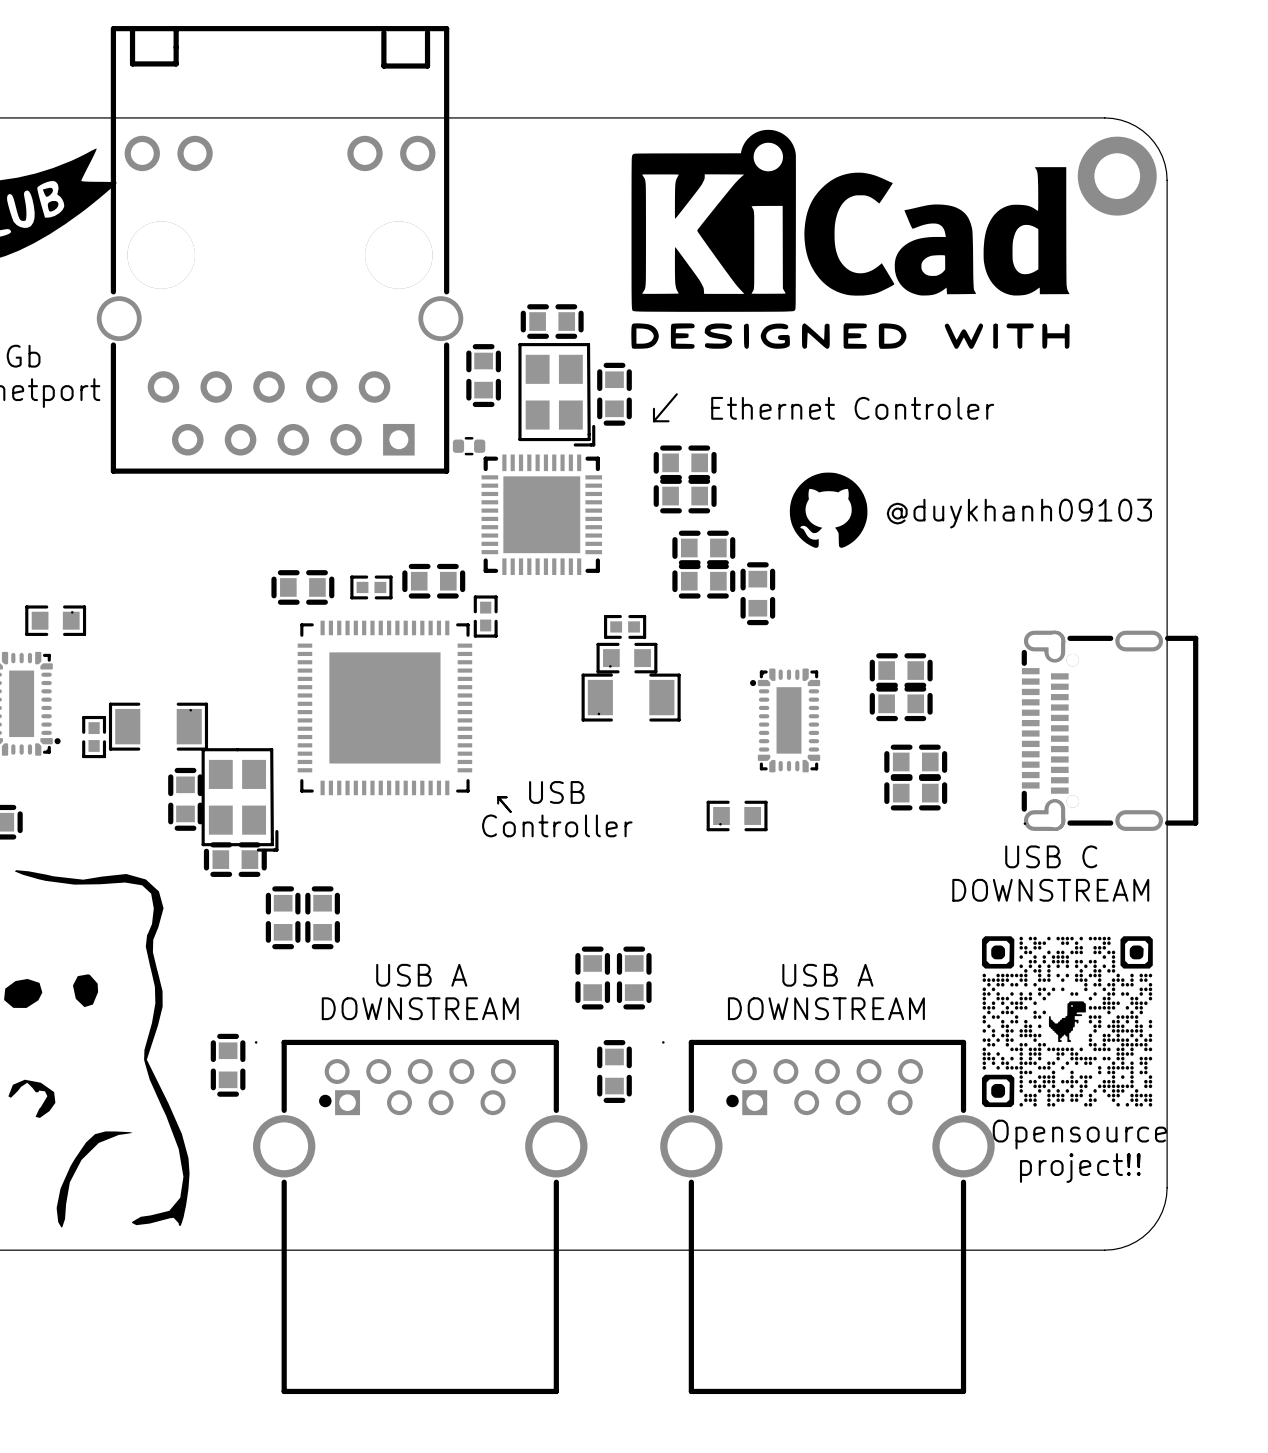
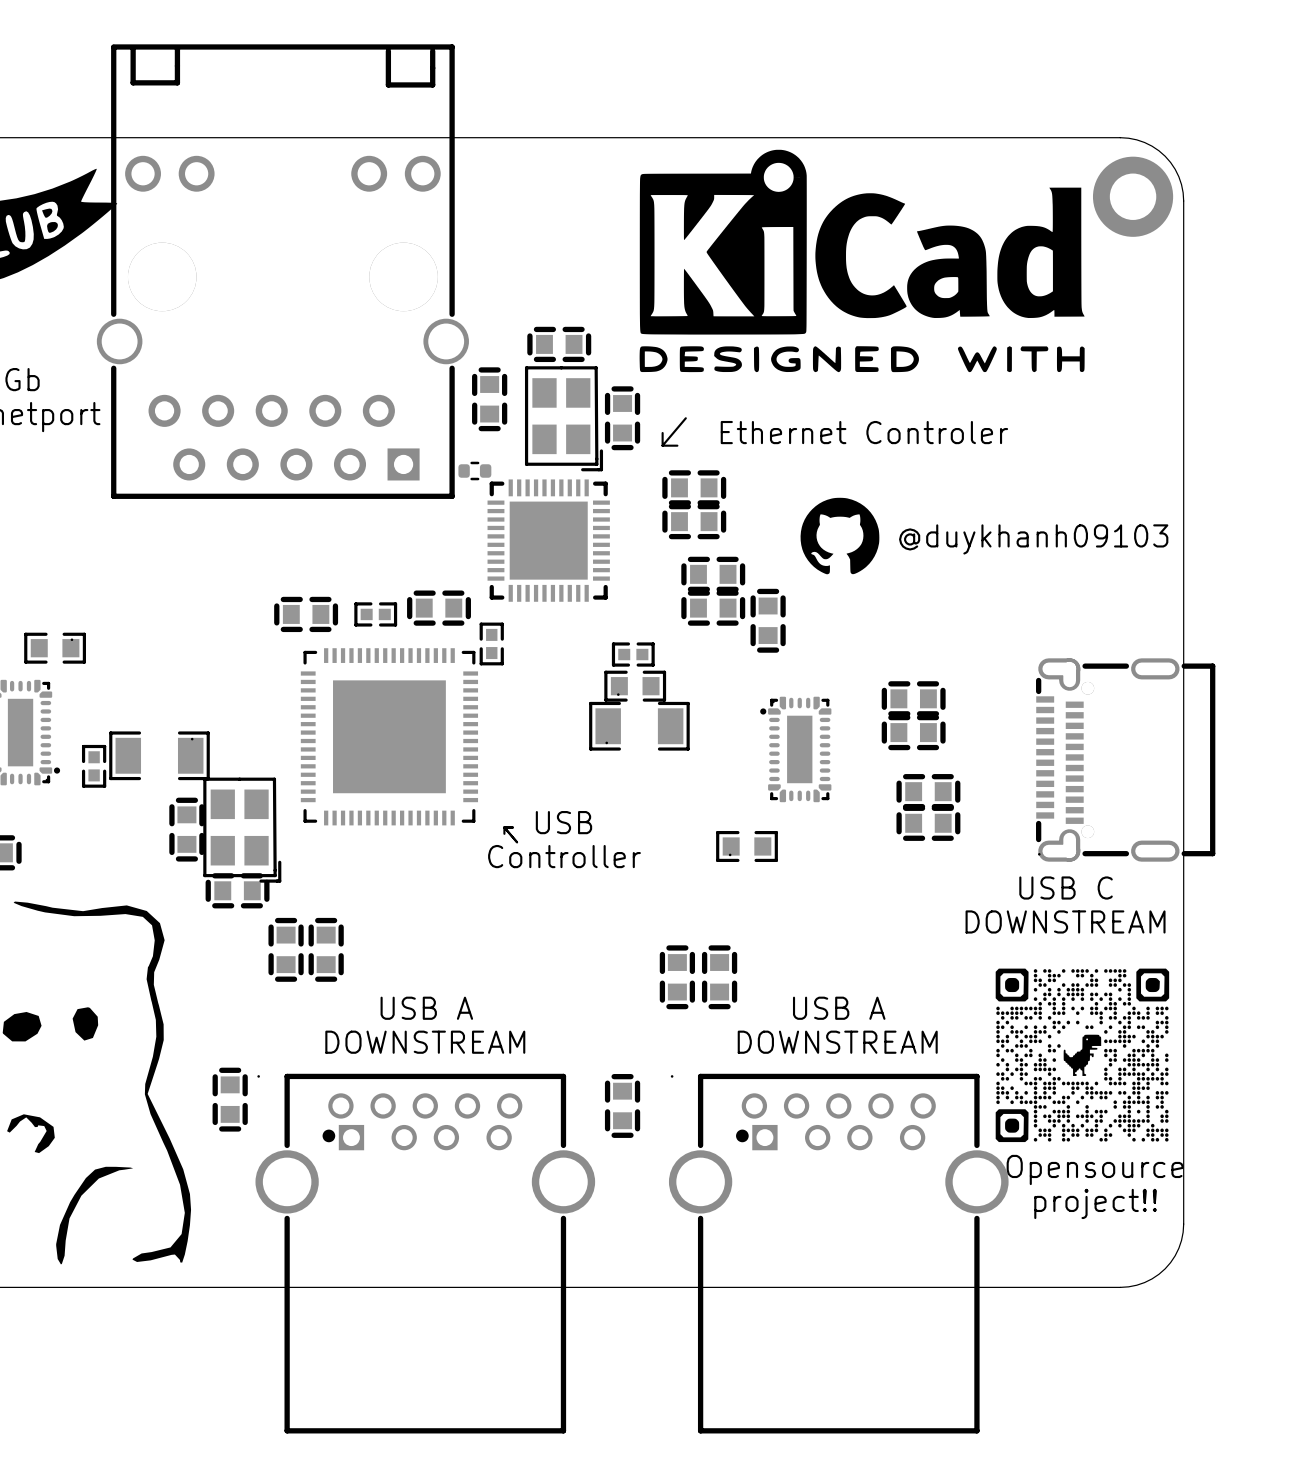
part: none -> (677, 977)
part: none -> (719, 977)
part: (592, 978) -> none
part: (634, 978) -> none

